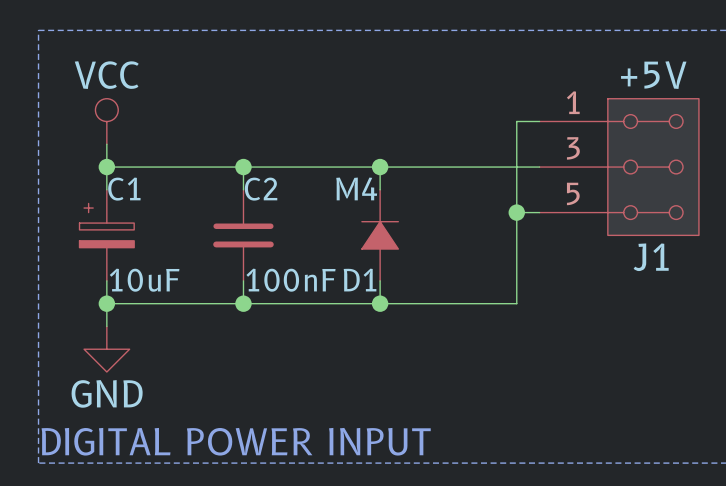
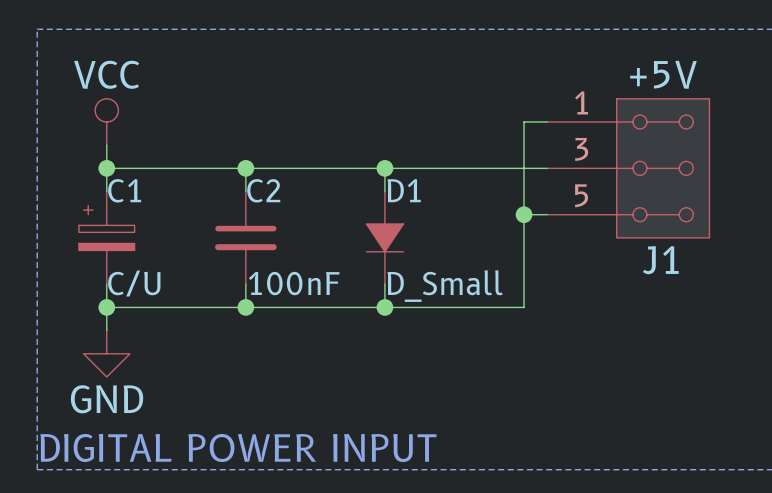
D1 value: M4 (356, 188) -> D_Small (445, 286)
D1 rotation: 0° (380, 235) -> 180° (384, 237)
C1 value: 10uF (144, 280) -> C/U (134, 283)

